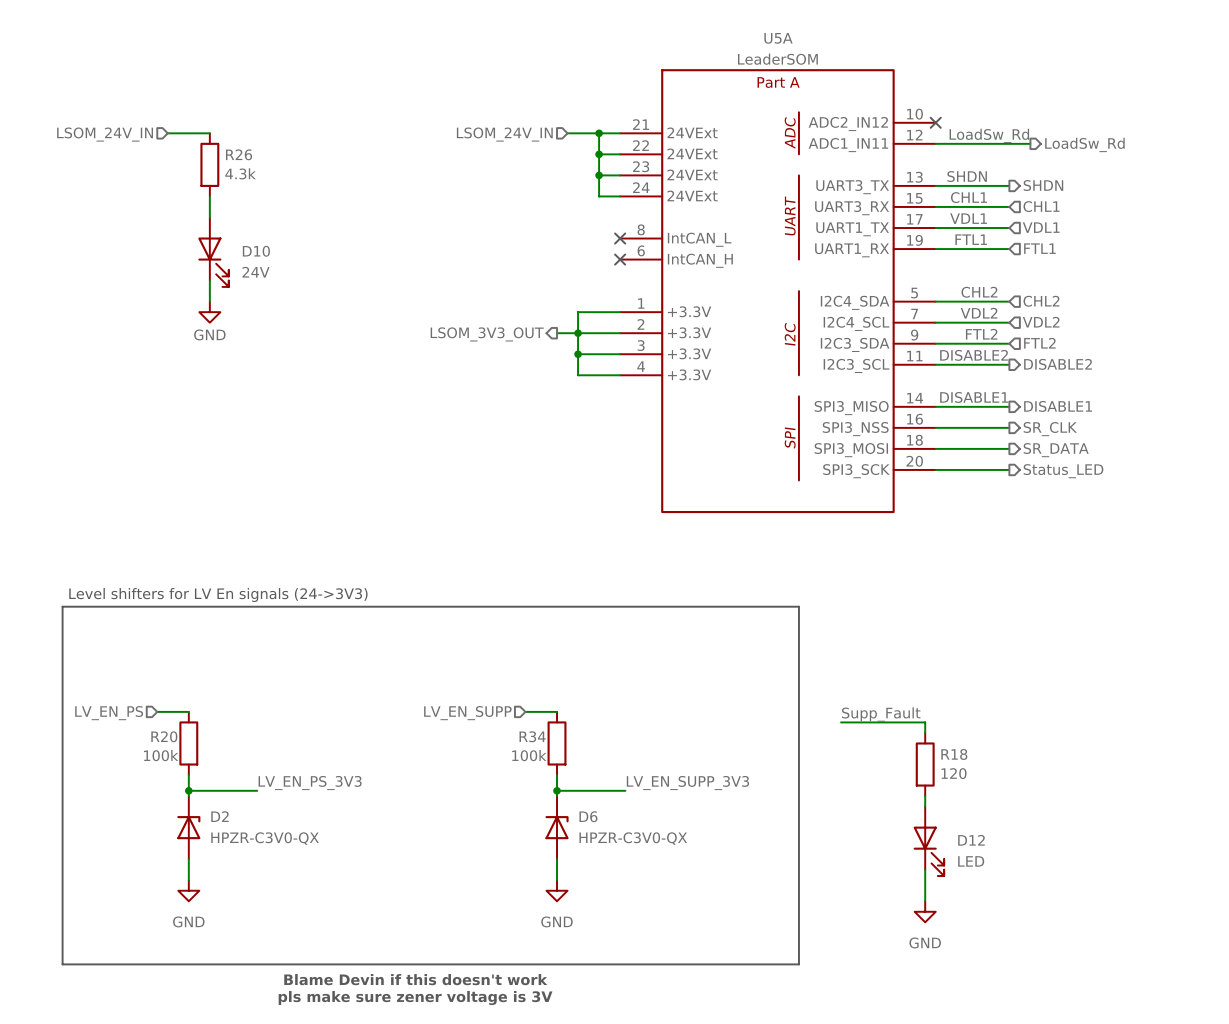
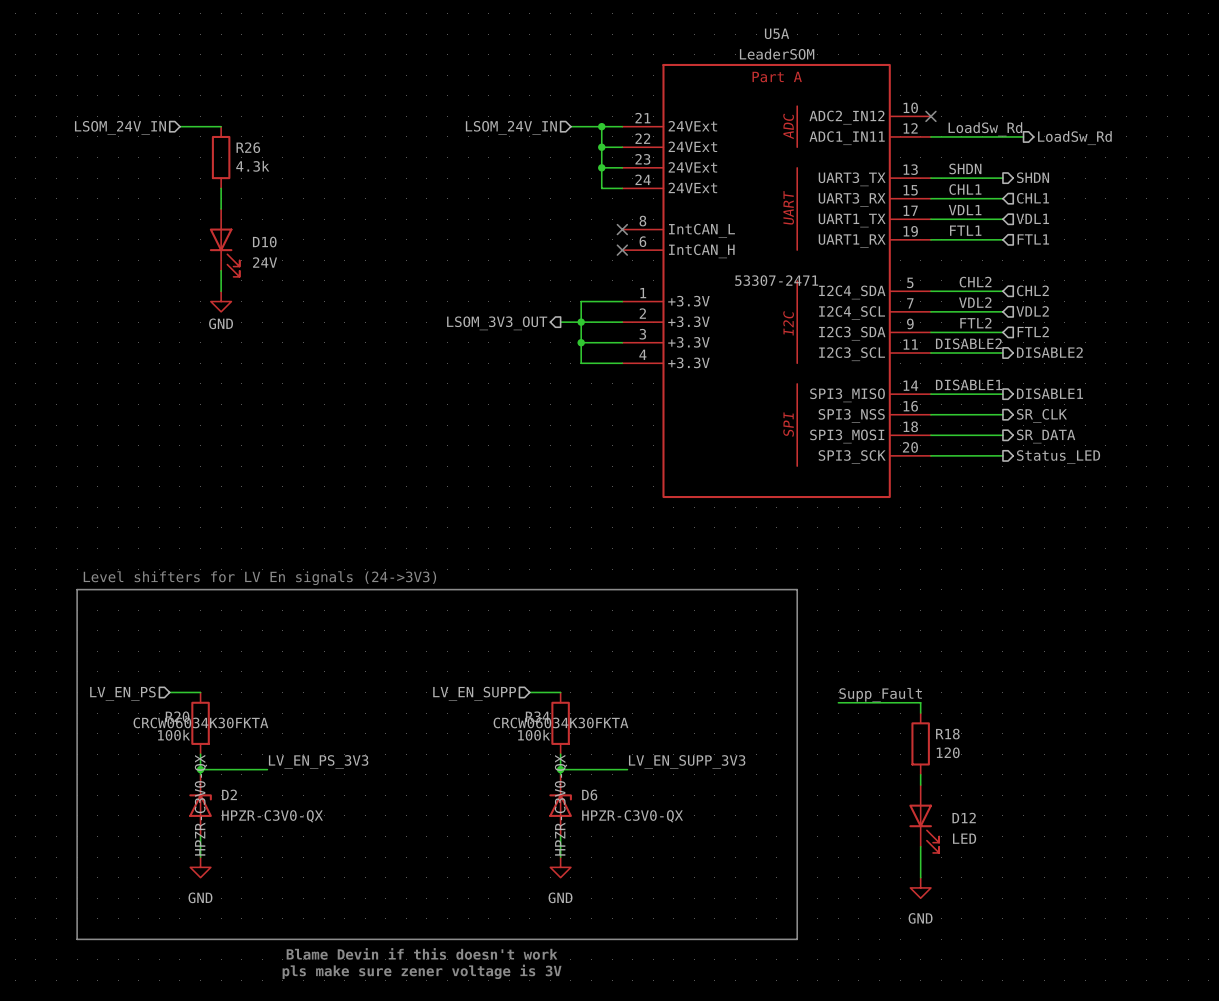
U5A text: none -> 53307-2471 (776, 280)
R20 text: none -> CRCW06034K30FKTA (200, 722)
R34 text: none -> CRCW06034K30FKTA (560, 722)
D2 text: none -> HPZR-C3V0-QX (201, 805)
D6 text: none -> HPZR-C3V0-QX (561, 805)

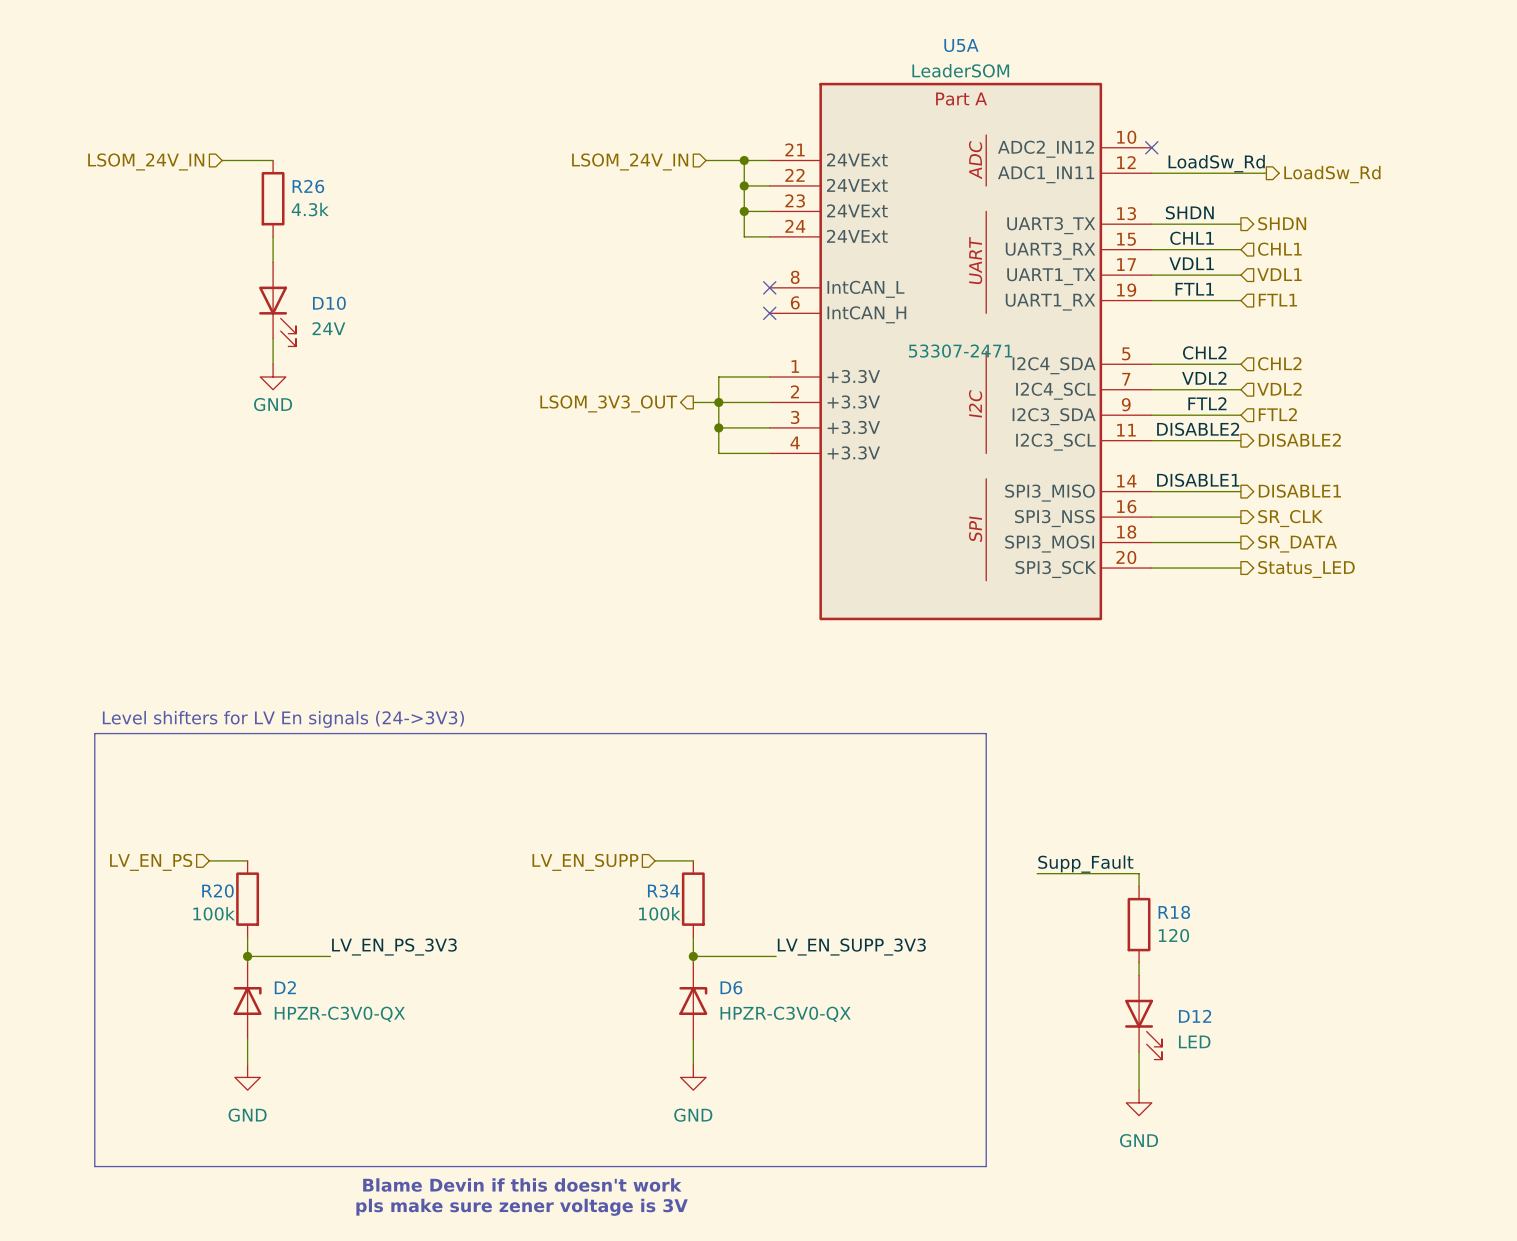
R20 text: CRCW06034K30FKTA (200, 722) -> none
R34 text: CRCW06034K30FKTA (560, 722) -> none
D2 text: HPZR-C3V0-QX (201, 805) -> none
D6 text: HPZR-C3V0-QX (561, 805) -> none

